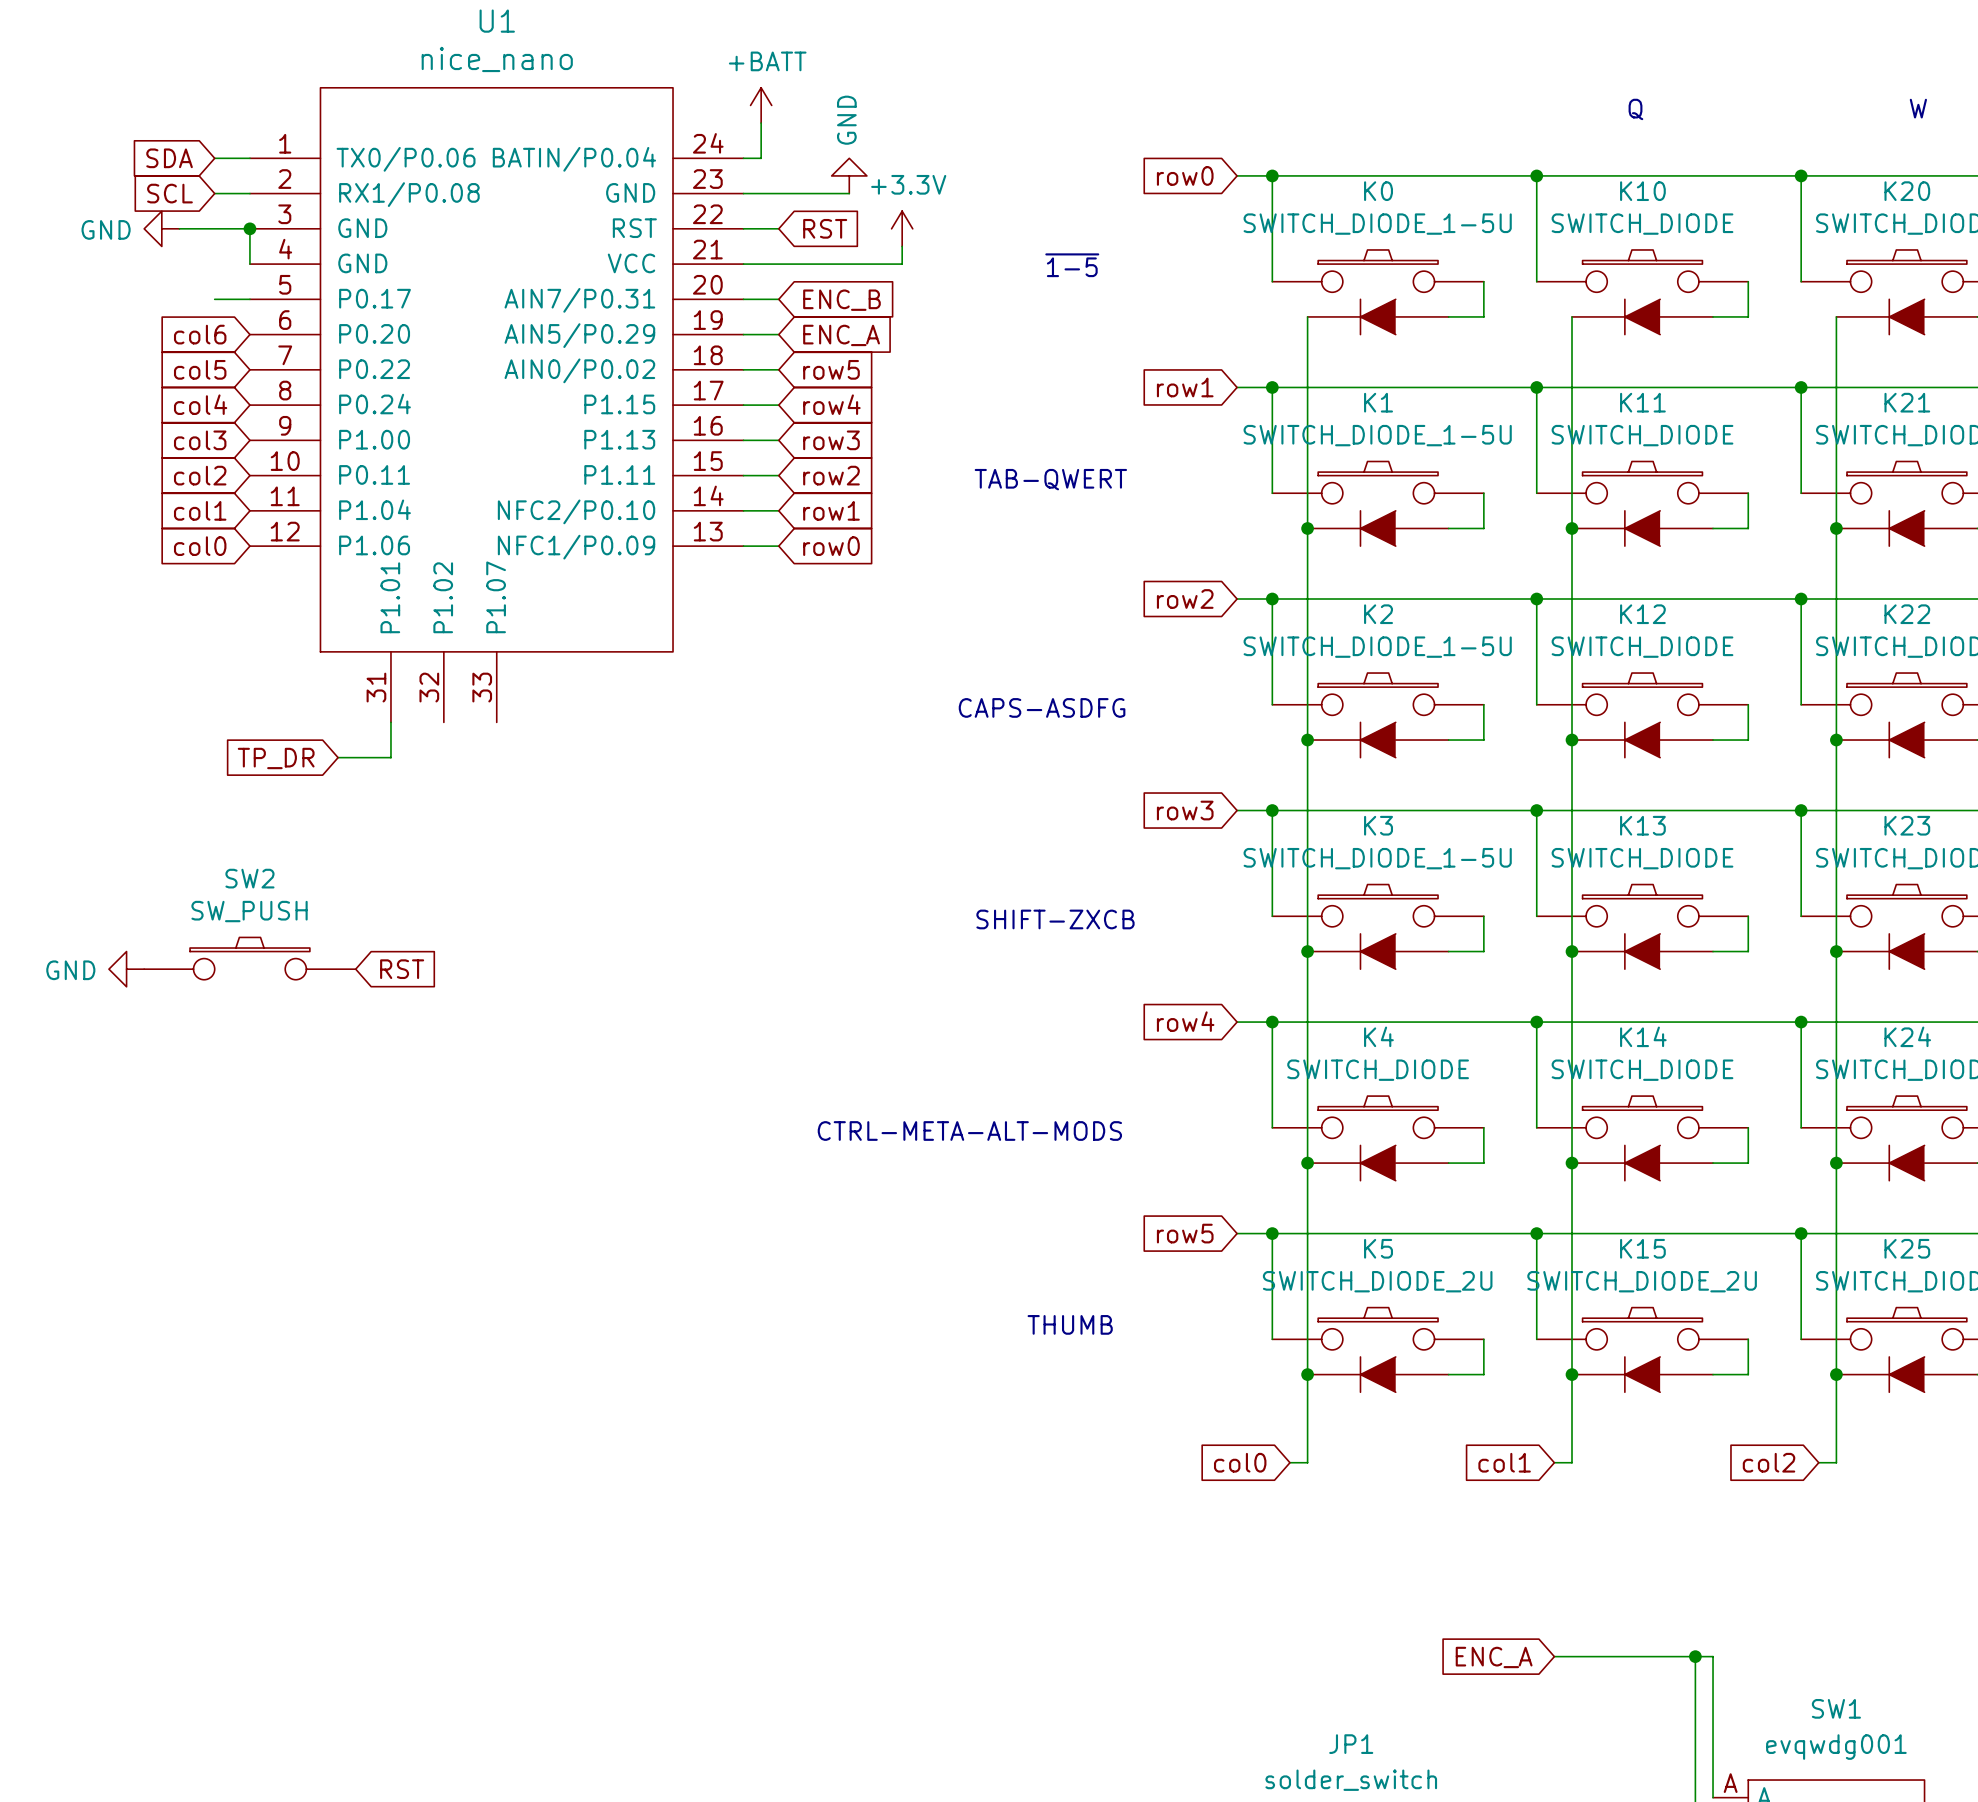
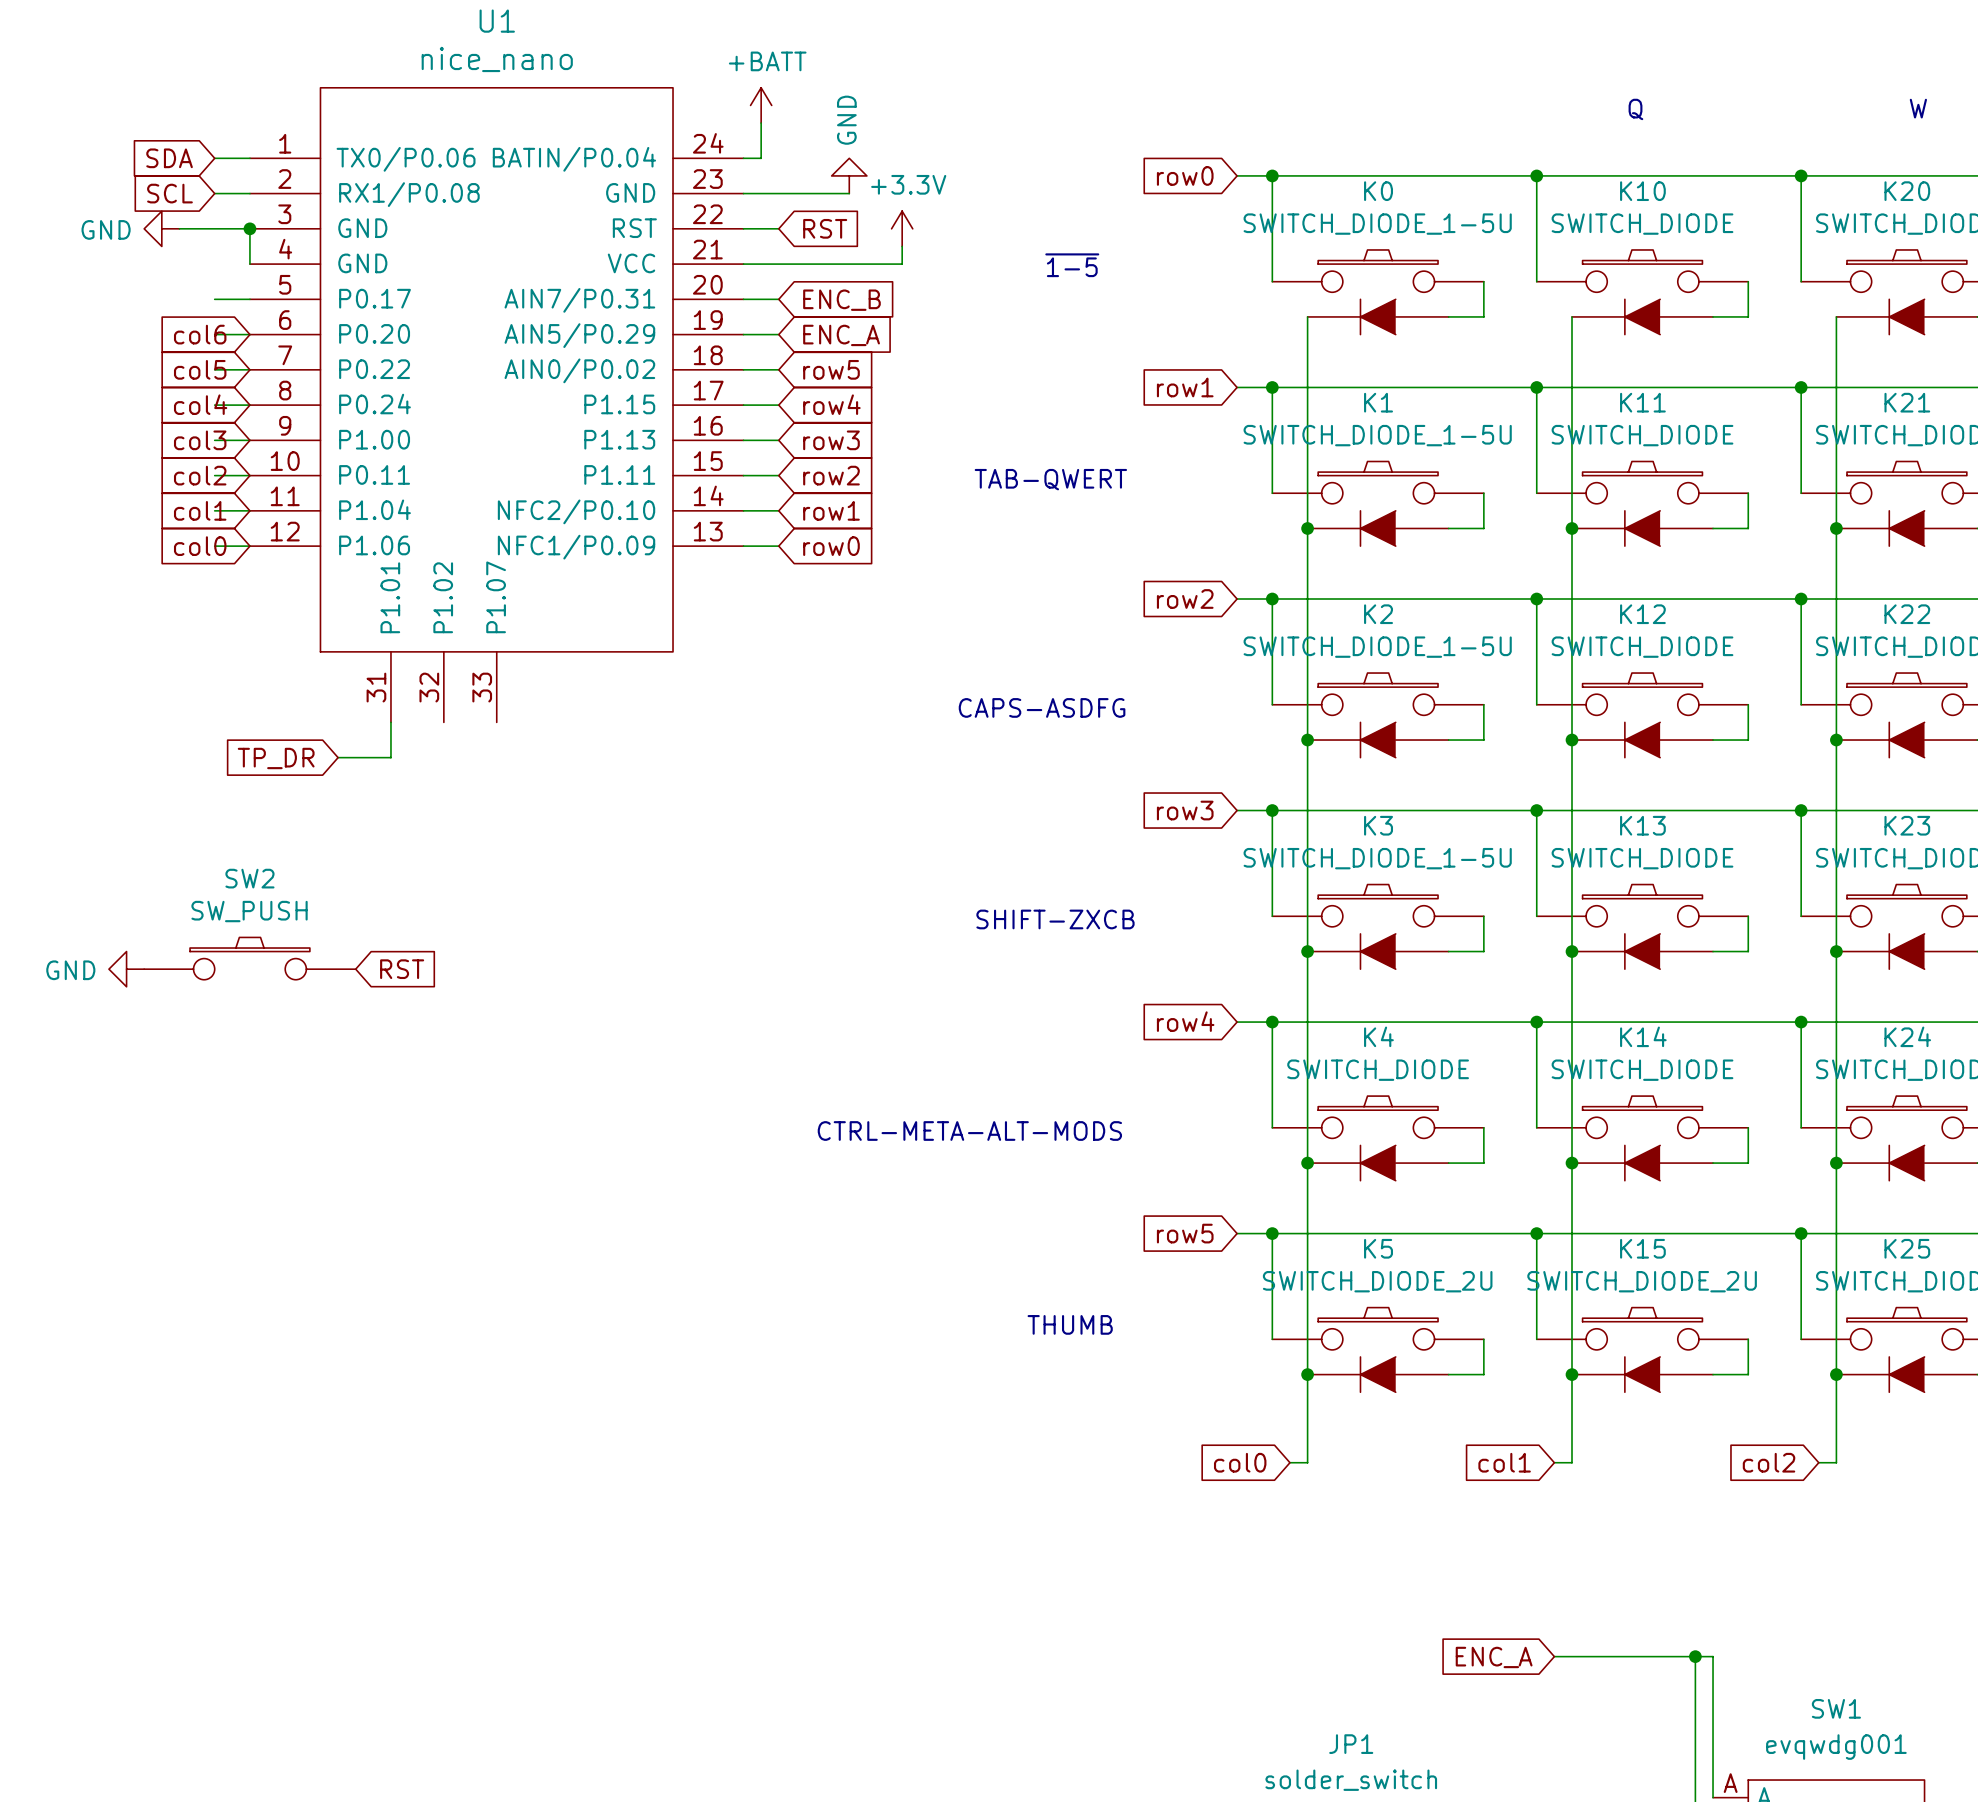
wire: none -> (214, 334) (249, 334)
wire: none -> (214, 369) (249, 369)
wire: none -> (214, 405) (249, 405)
wire: none -> (214, 440) (249, 440)
wire: none -> (214, 475) (249, 475)
wire: none -> (214, 510) (249, 510)
wire: none -> (214, 546) (249, 546)

